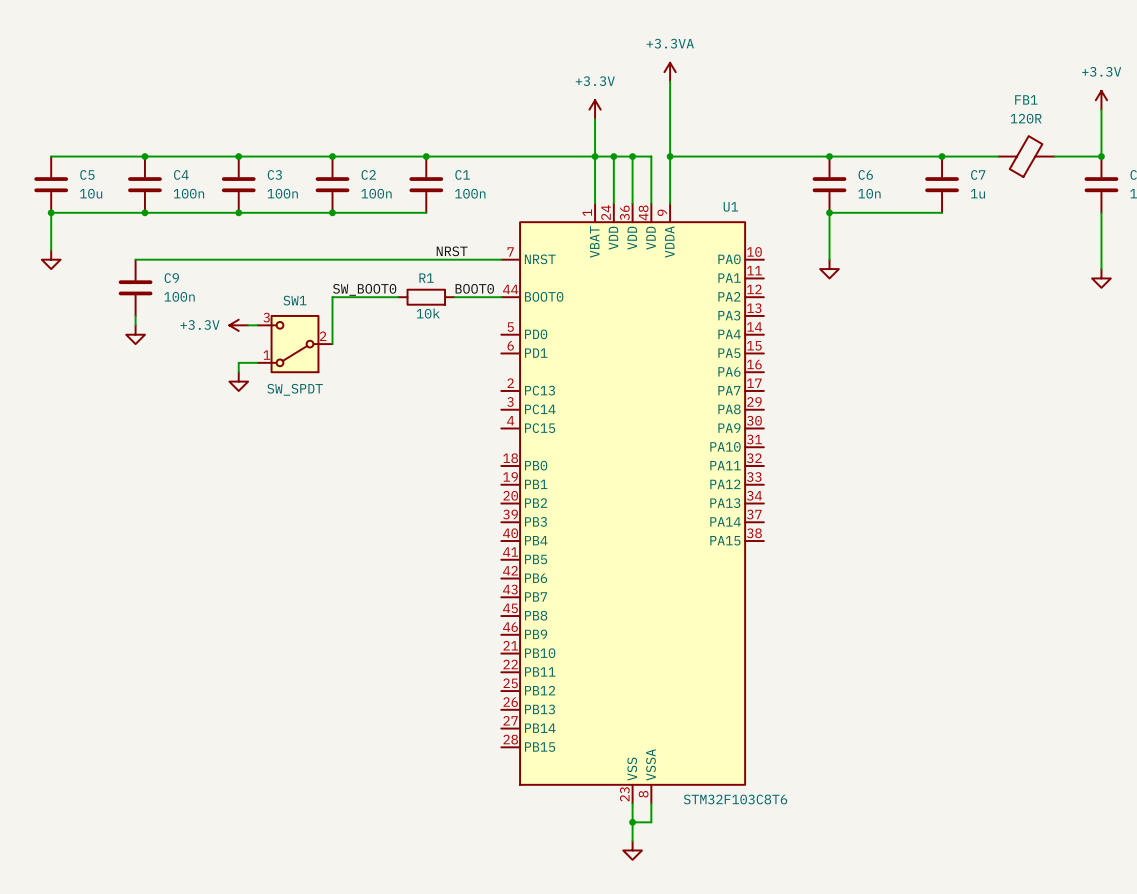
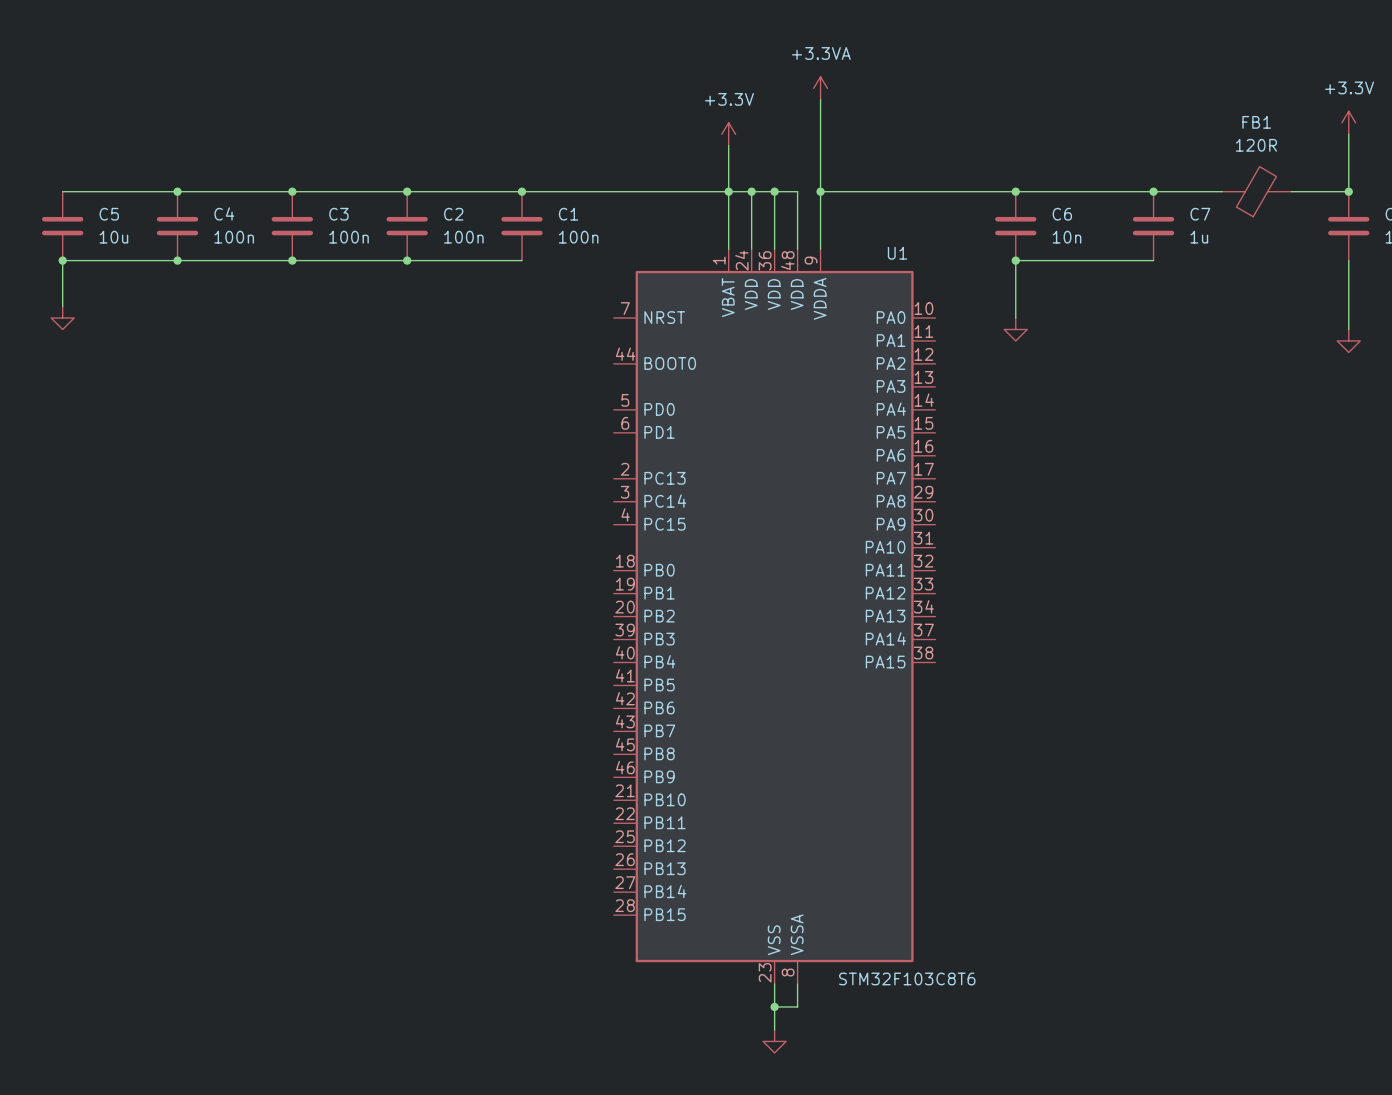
label: NRST (452, 251) -> none
wire: (135, 259) (501, 259) -> none
C9: 100n (135, 287) -> none
label: BOOT0 (474, 288) -> none
label: SW_BOOT0 (364, 289) -> none
wire: (398, 297) (332, 297) (332, 344) -> none
R1: 10k (426, 297) -> none
wire: (454, 297) (501, 297) -> none
wire: (135, 315) (135, 325) -> none
power symbol: +3.3V (238, 325) -> none
wire: (248, 325) (257, 325) -> none
power symbol: (135, 334) -> none
SW1: SW_SPDT (295, 344) -> none
wire: (257, 362) (238, 362) (238, 372) -> none
power symbol: (238, 381) -> none

